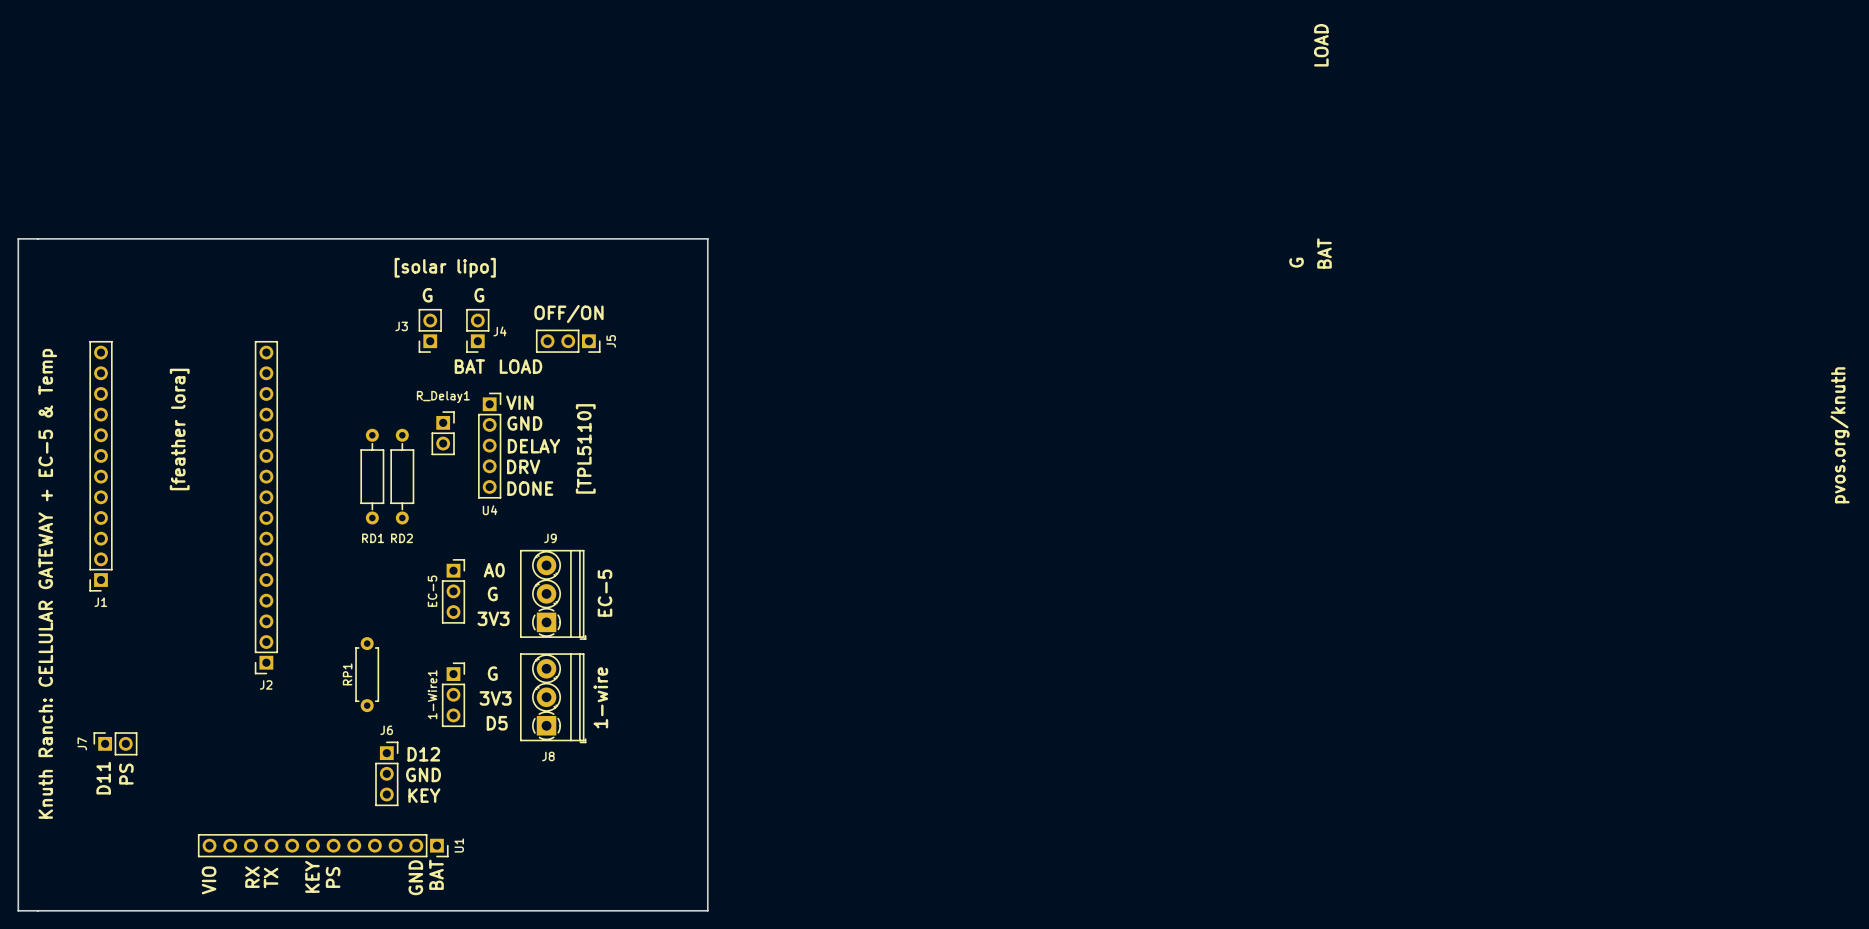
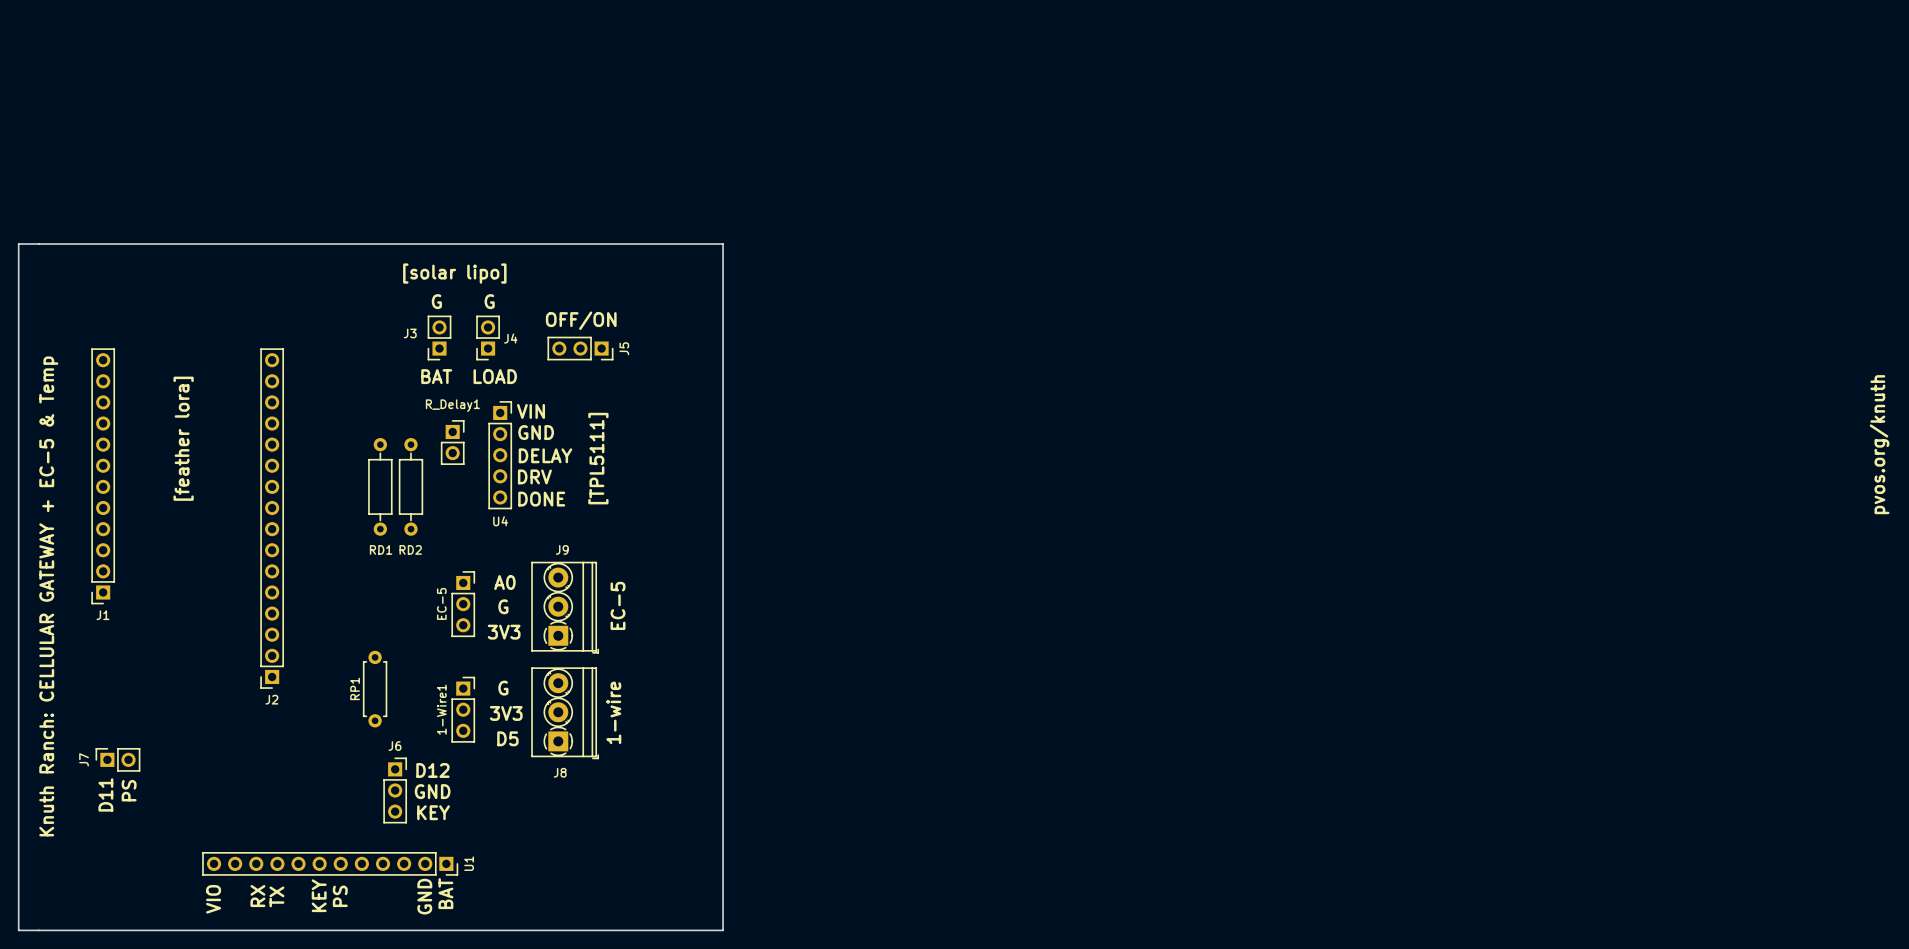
text: LOAD (1321, 45) -> none
text: BAT (1324, 253) -> none
text: G (1296, 262) -> none
text position: BAT (469, 366) -> BAT (436, 376)
text position: LOAD (520, 366) -> LOAD (495, 376)
text: [TPL5110] (585, 448) -> [TPL5111] (598, 458)

